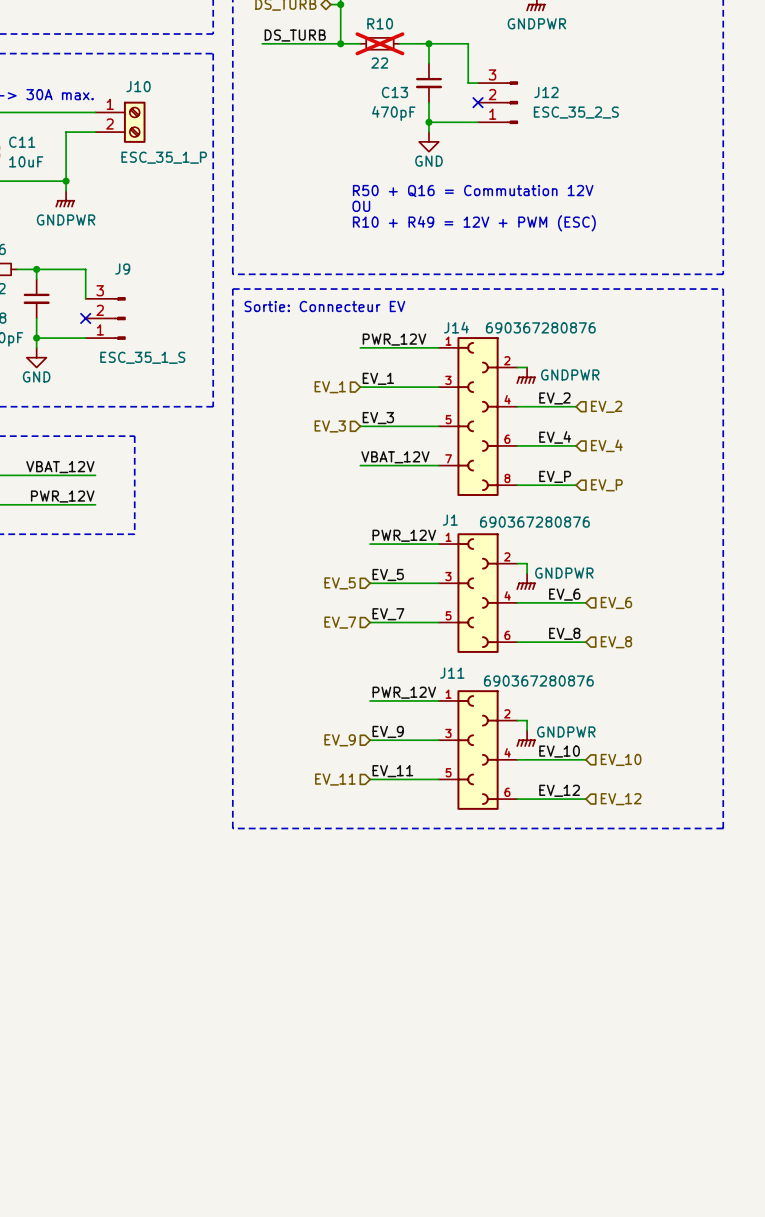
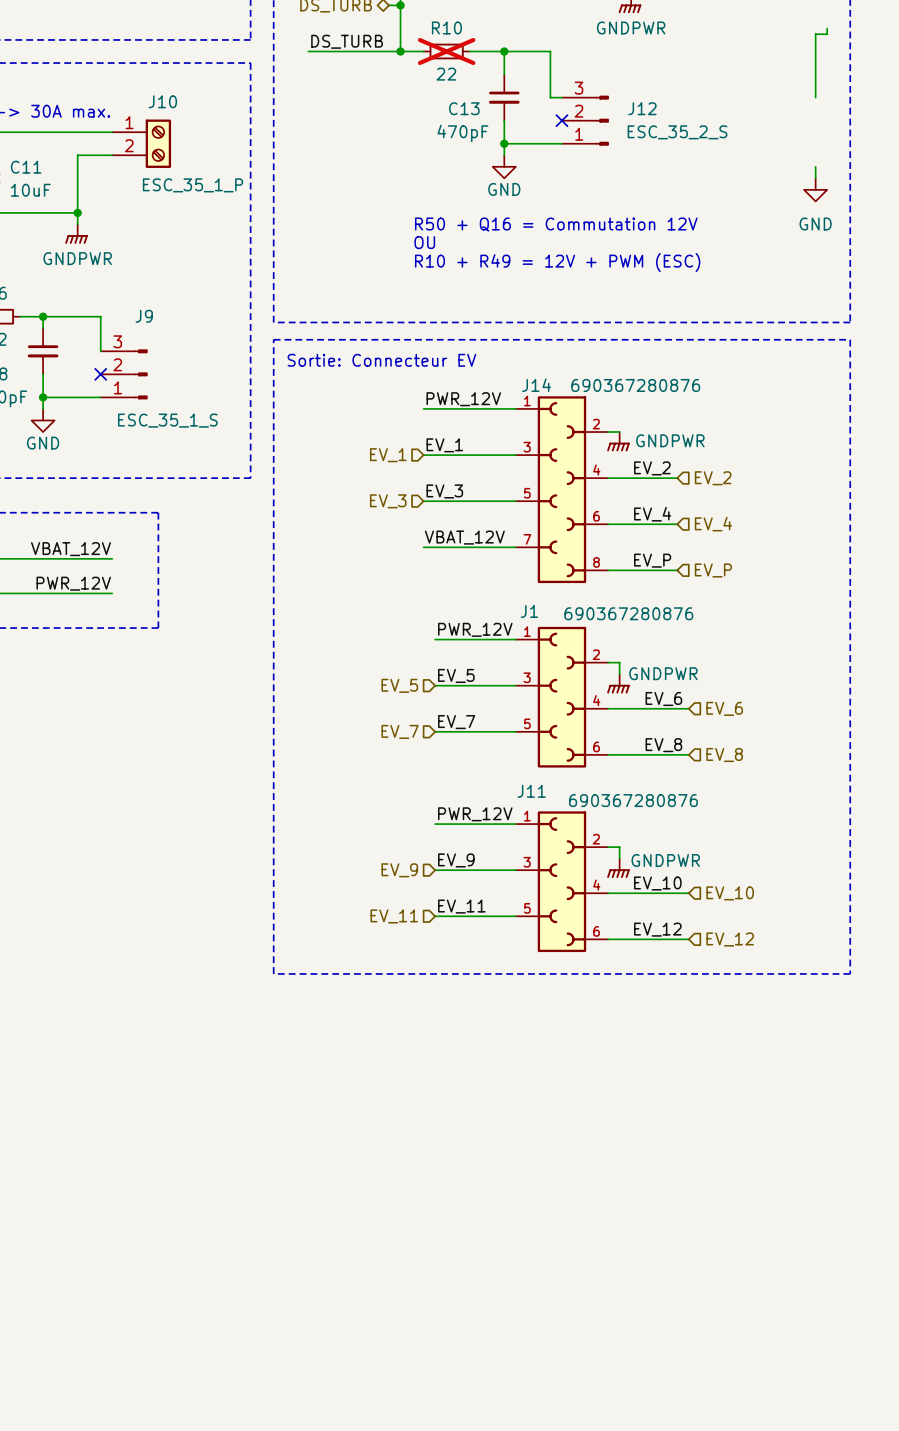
wire: none -> (827, 28) (827, 34) (815, 34) (815, 97)
wire: none -> (815, 166) (815, 178)
power symbol: none -> GND (815, 189)

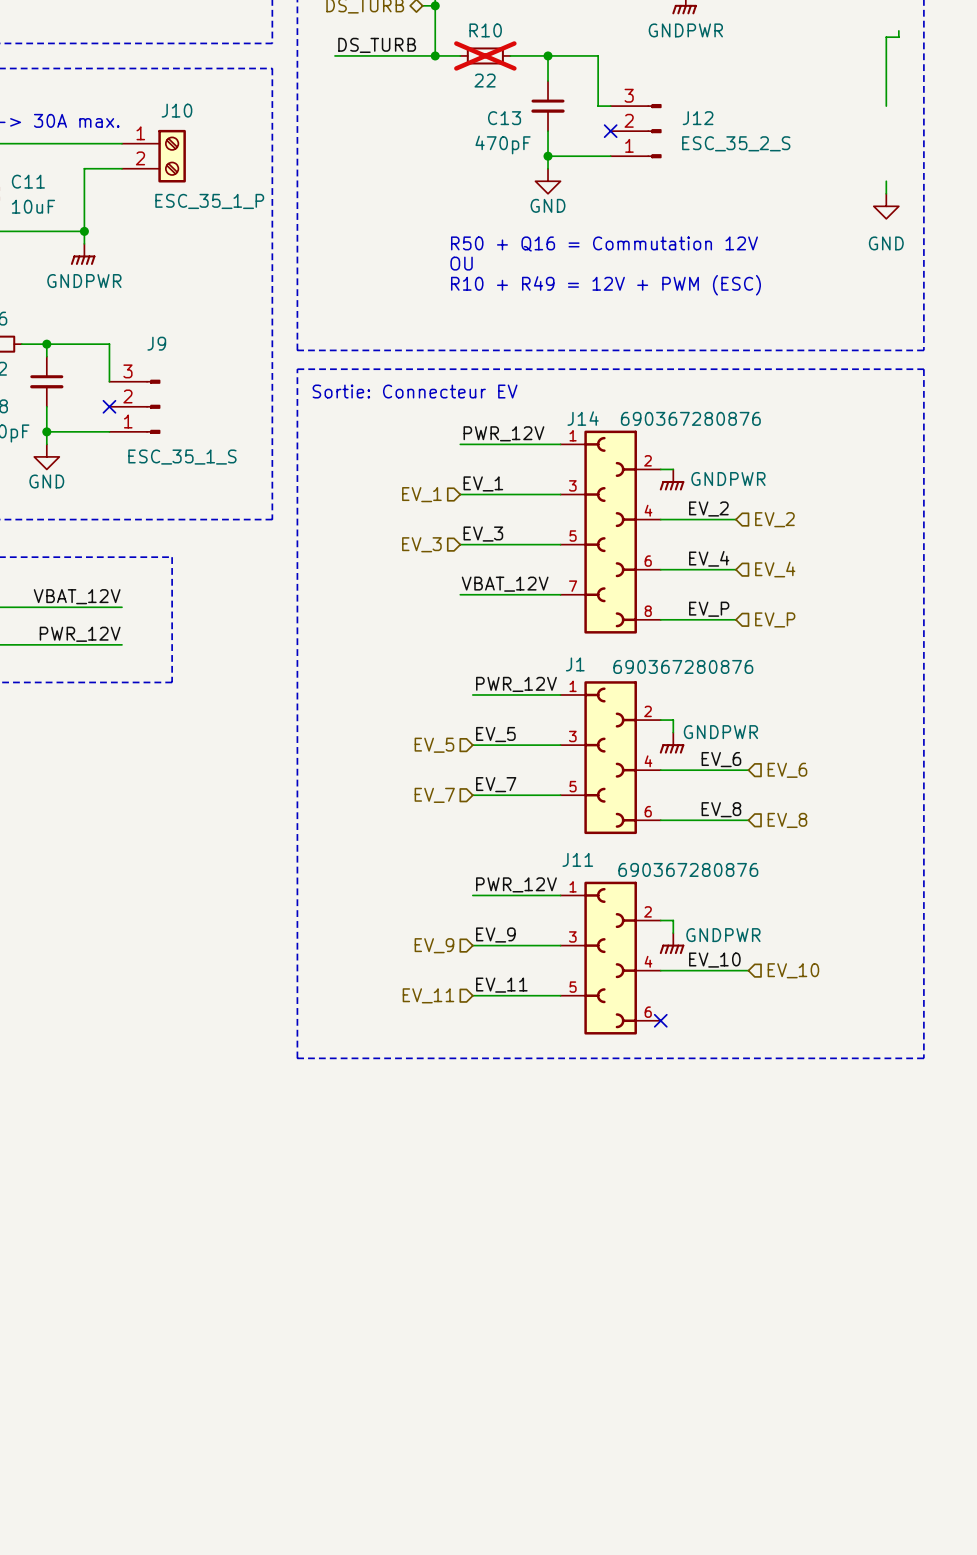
label: EV_12 (657, 929) -> none
wire: (608, 939) (688, 939) -> none
no-connect mark: none -> (660, 1020)
hierarchical label: EV_12 (730, 939) -> none

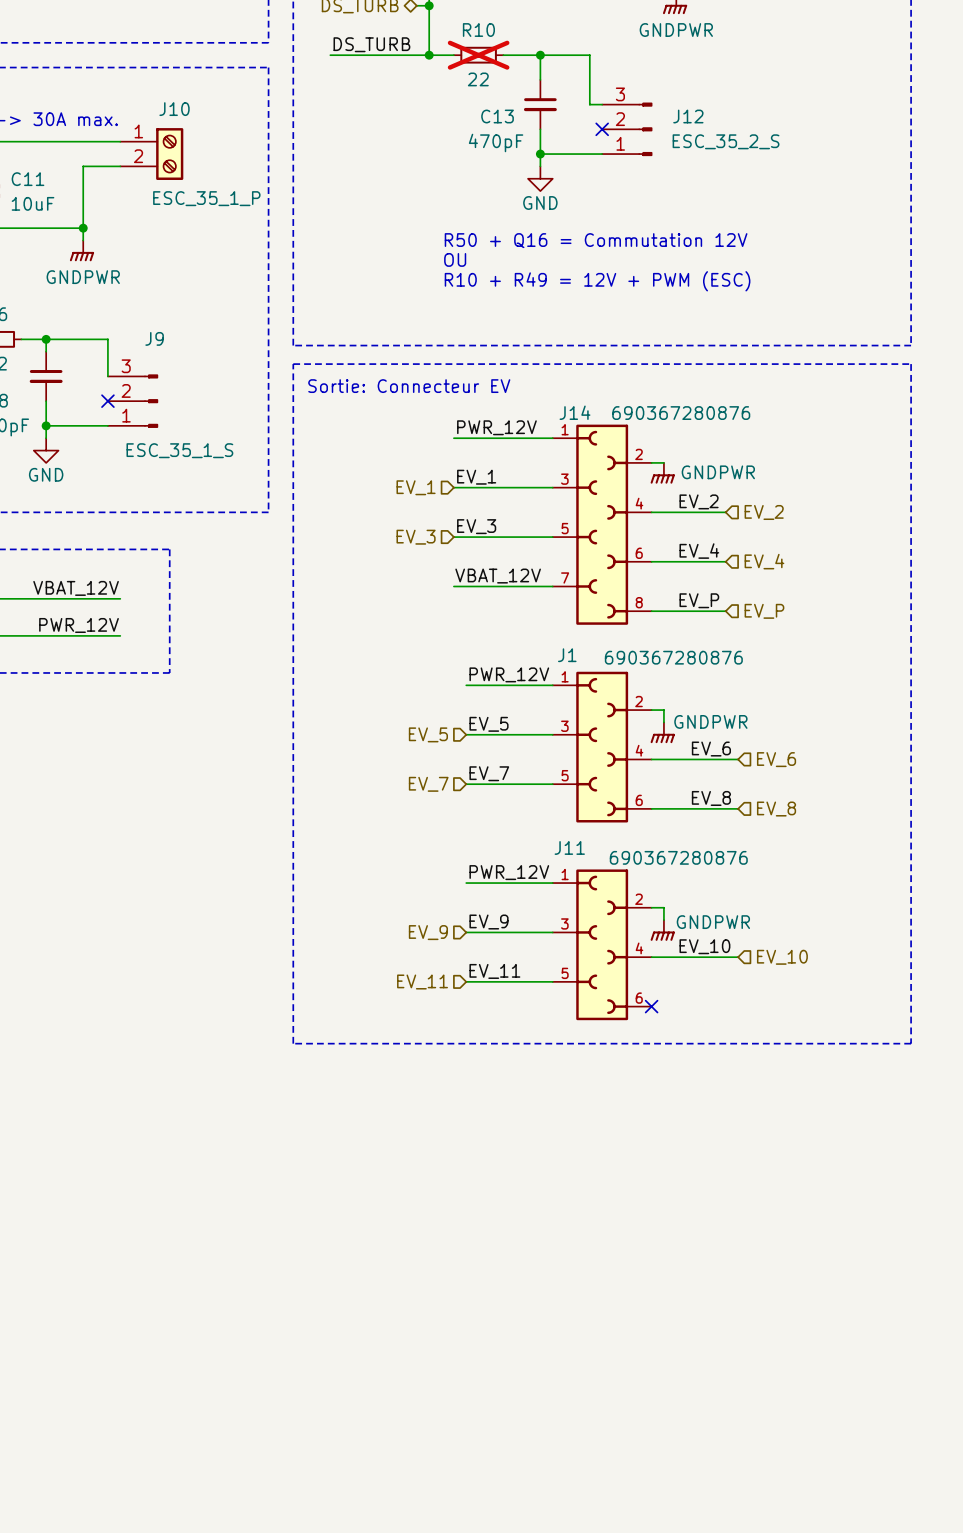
wire: (898, 30) (898, 37) (886, 37) (886, 106) -> none
wire: (886, 181) (886, 193) -> none
power symbol: GND (886, 206) -> none

